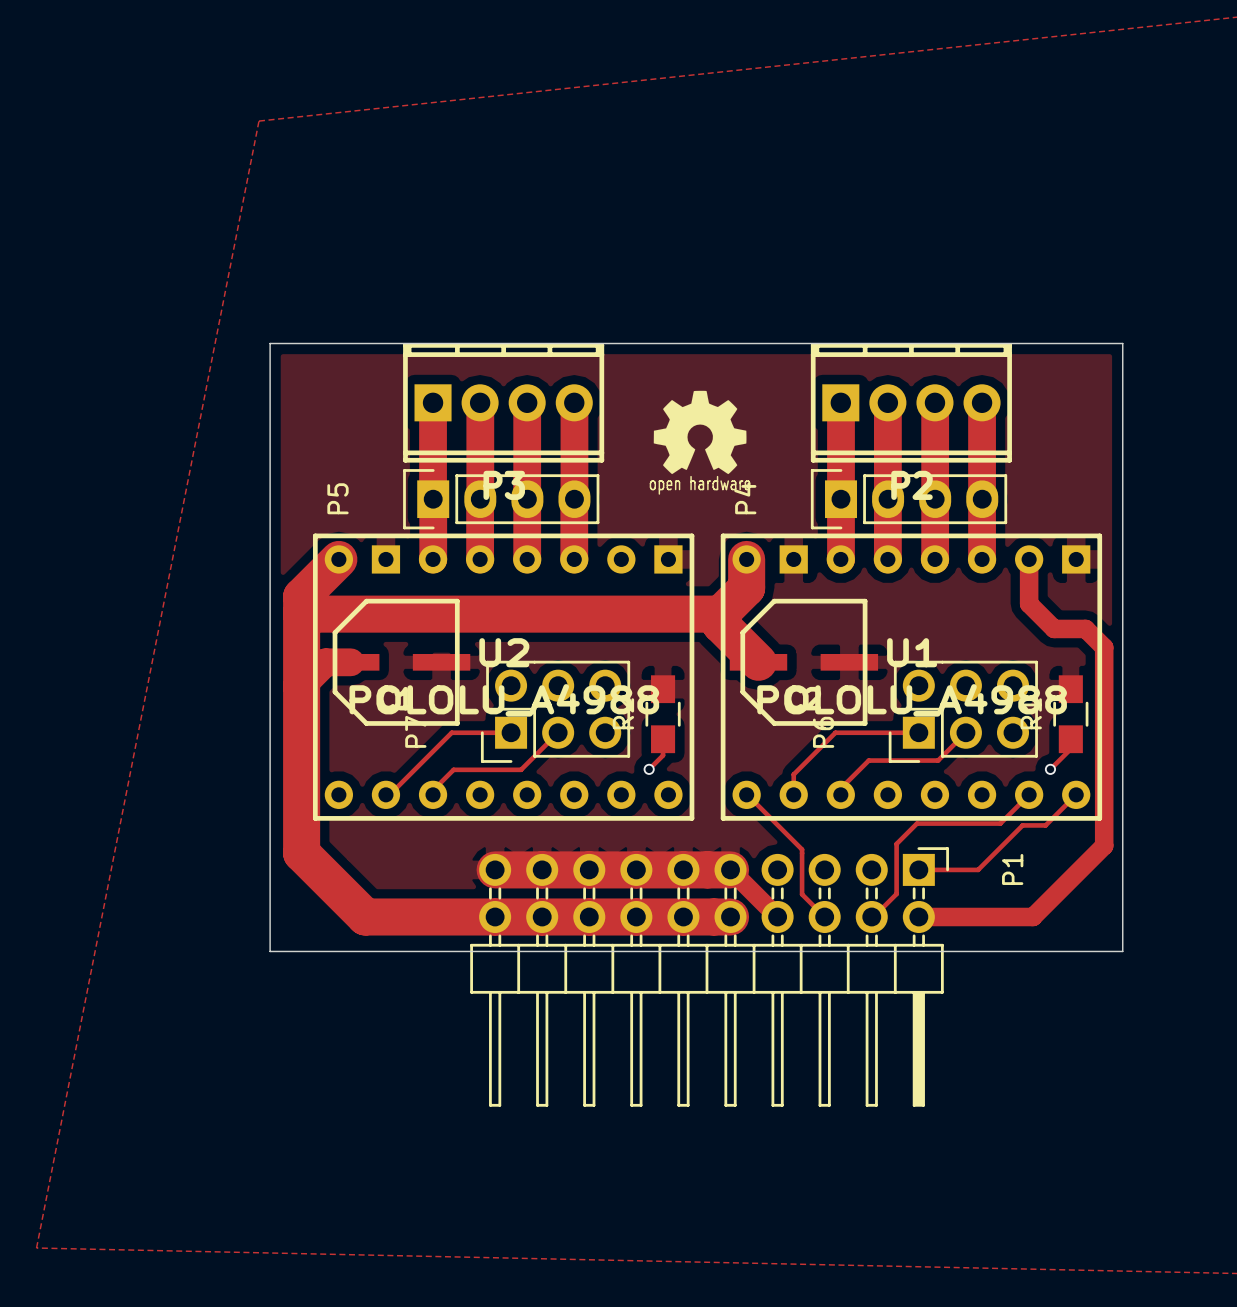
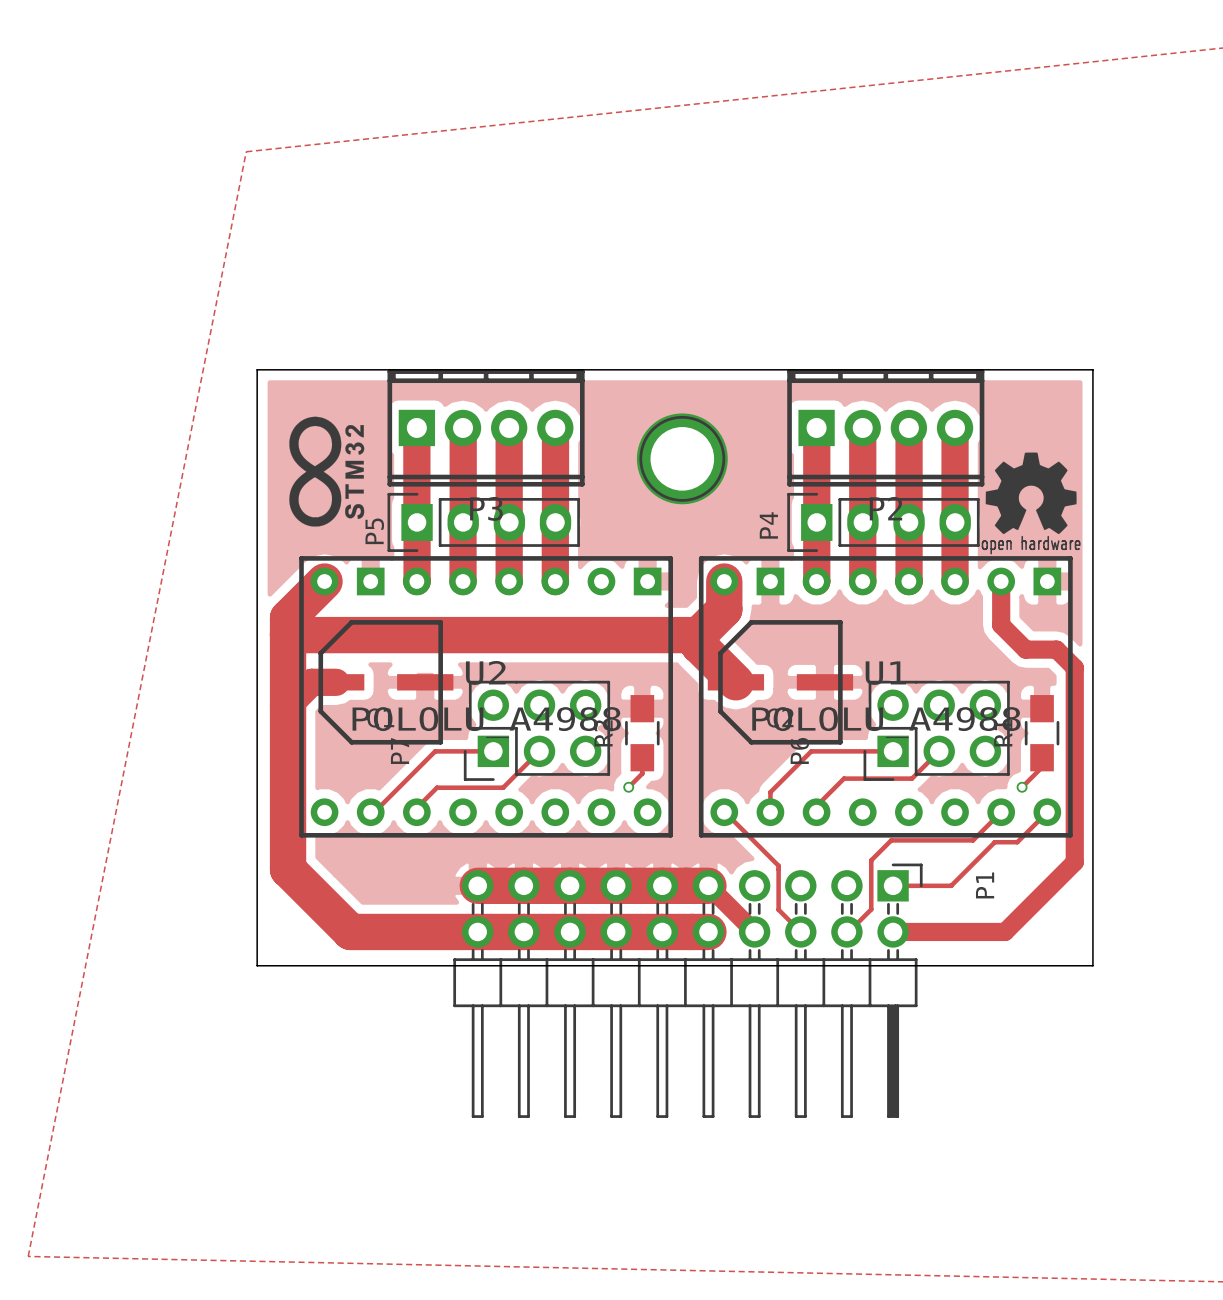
drawing: none -> [289, 416, 365, 527]
part: none -> (682, 458)
drawing position: (700, 442) -> (1031, 503)
P5 name position: P5 (337, 498) -> P5 (374, 531)
P4 name position: P4 (745, 498) -> P4 (768, 525)

